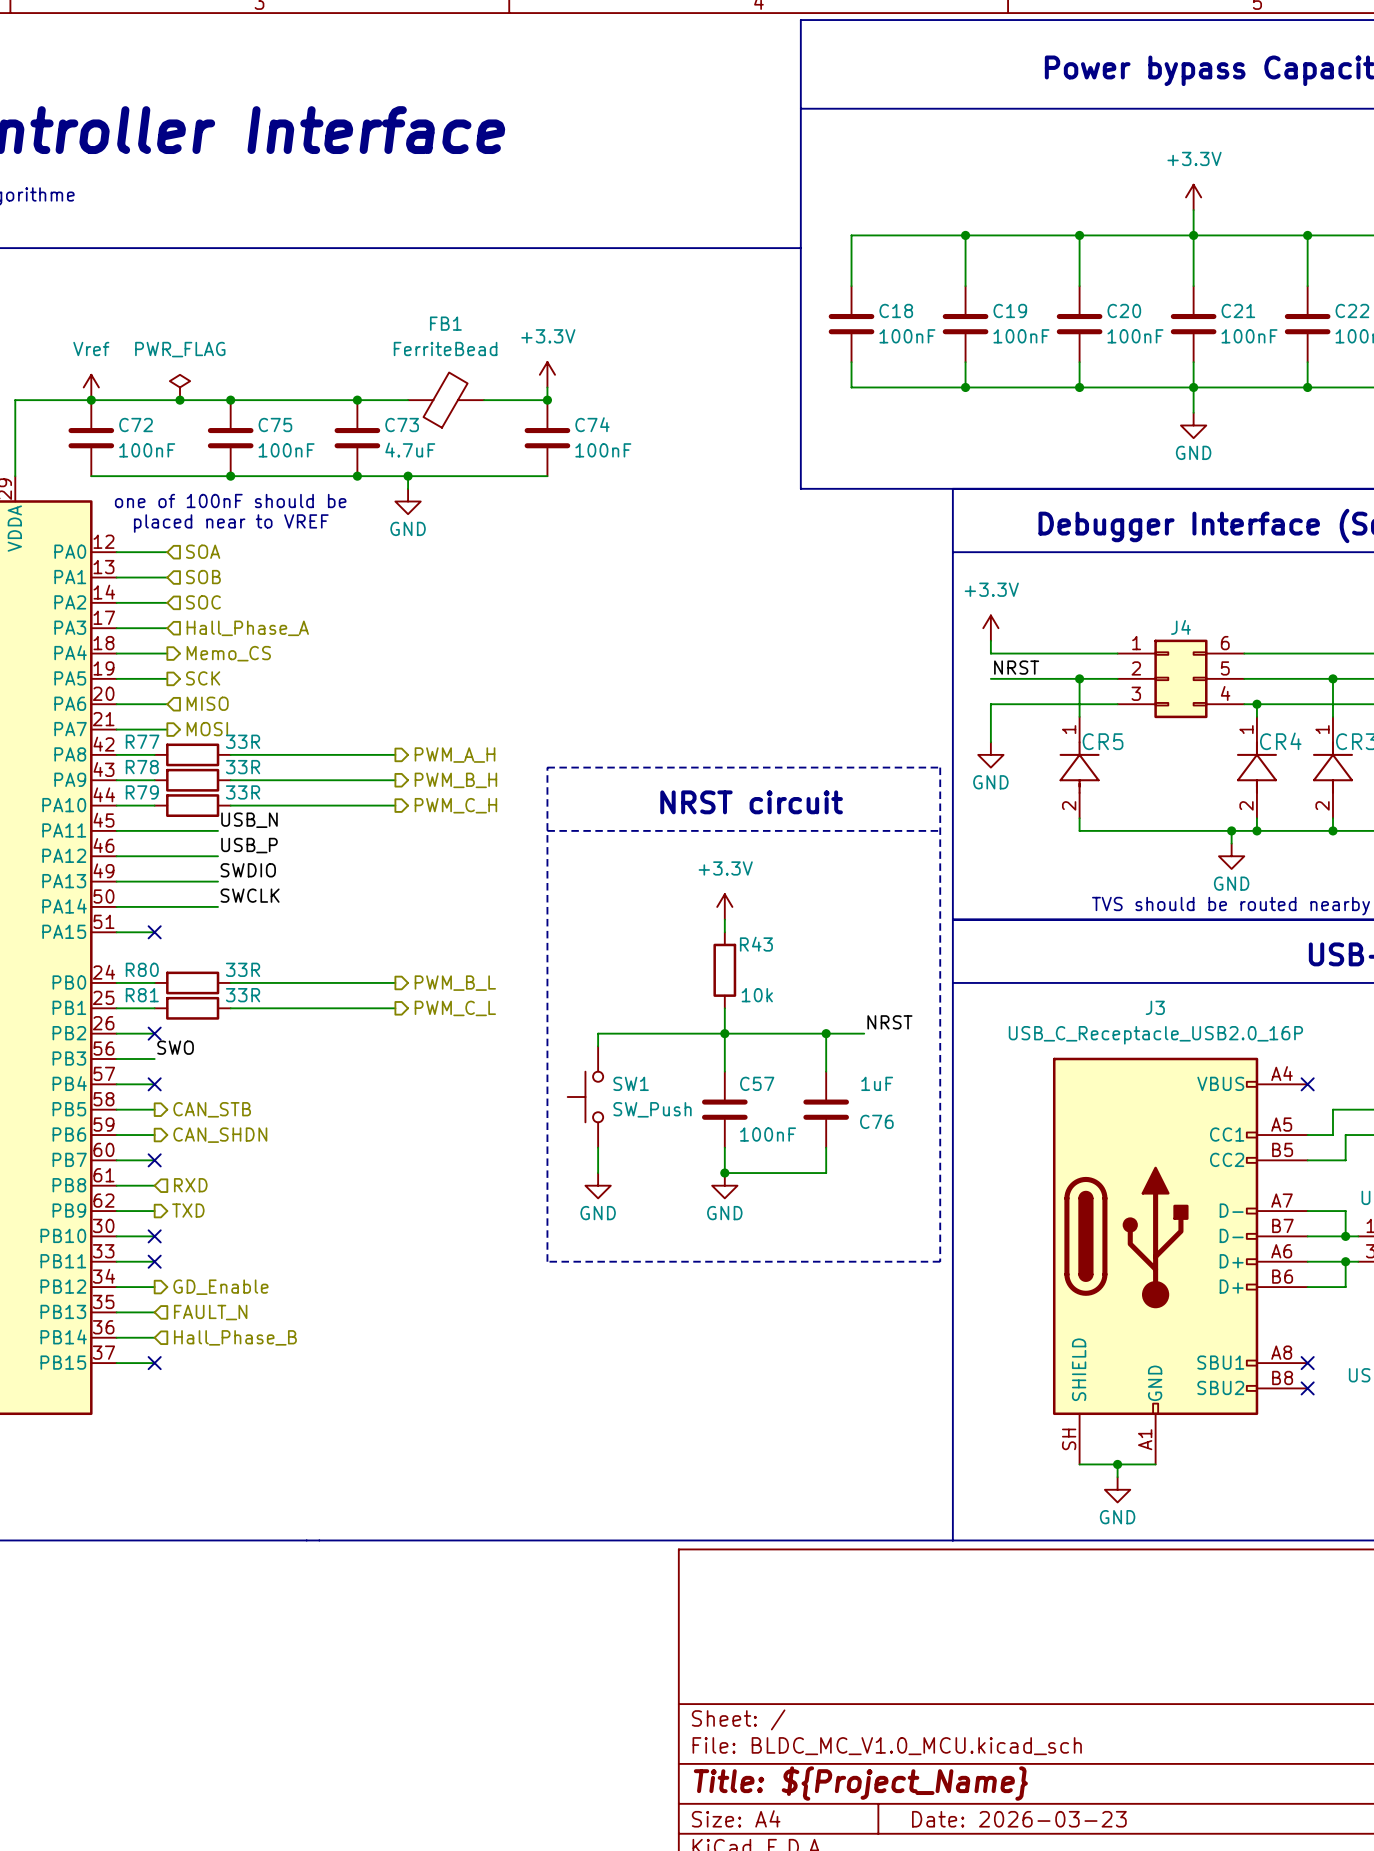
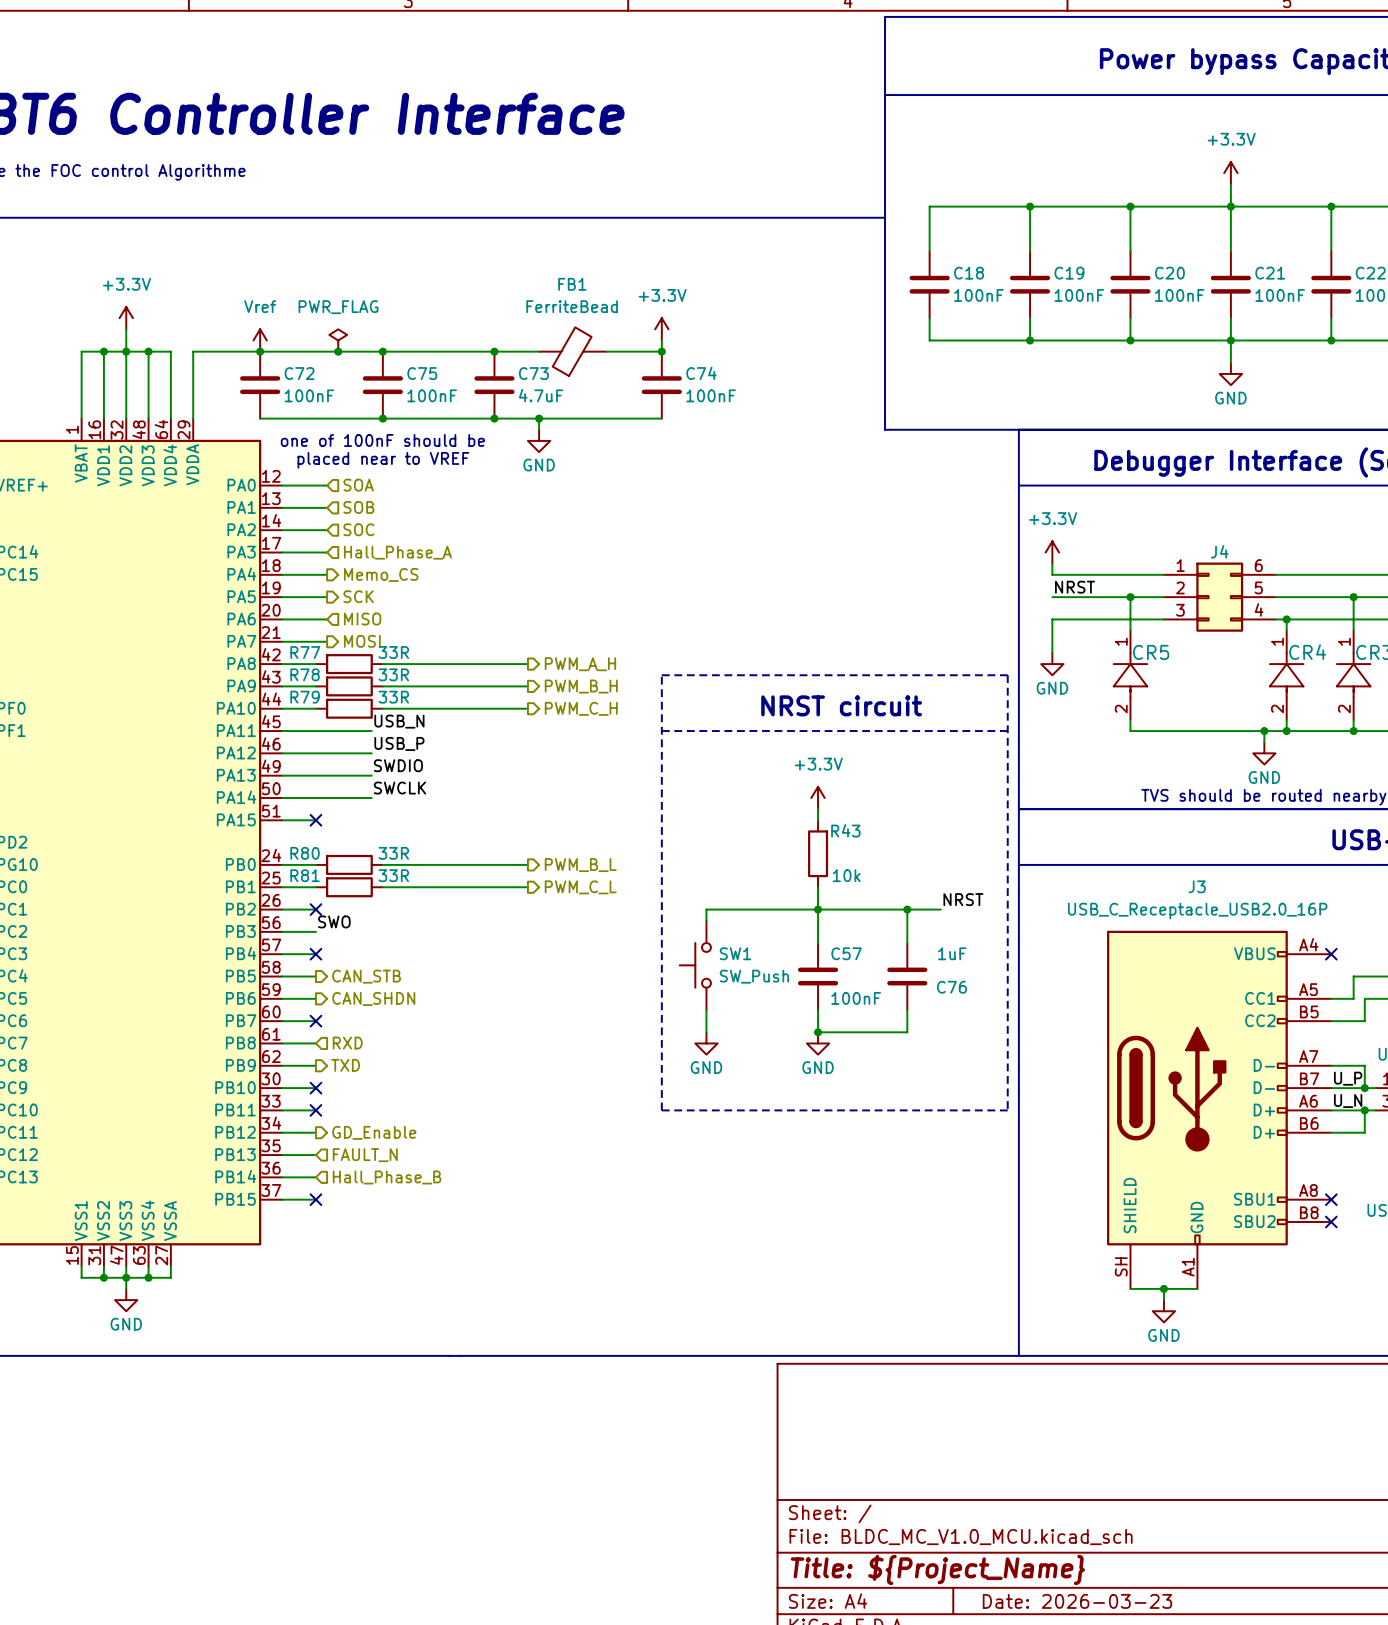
label: none -> U_P (1348, 1078)
label: none -> U_N (1348, 1100)

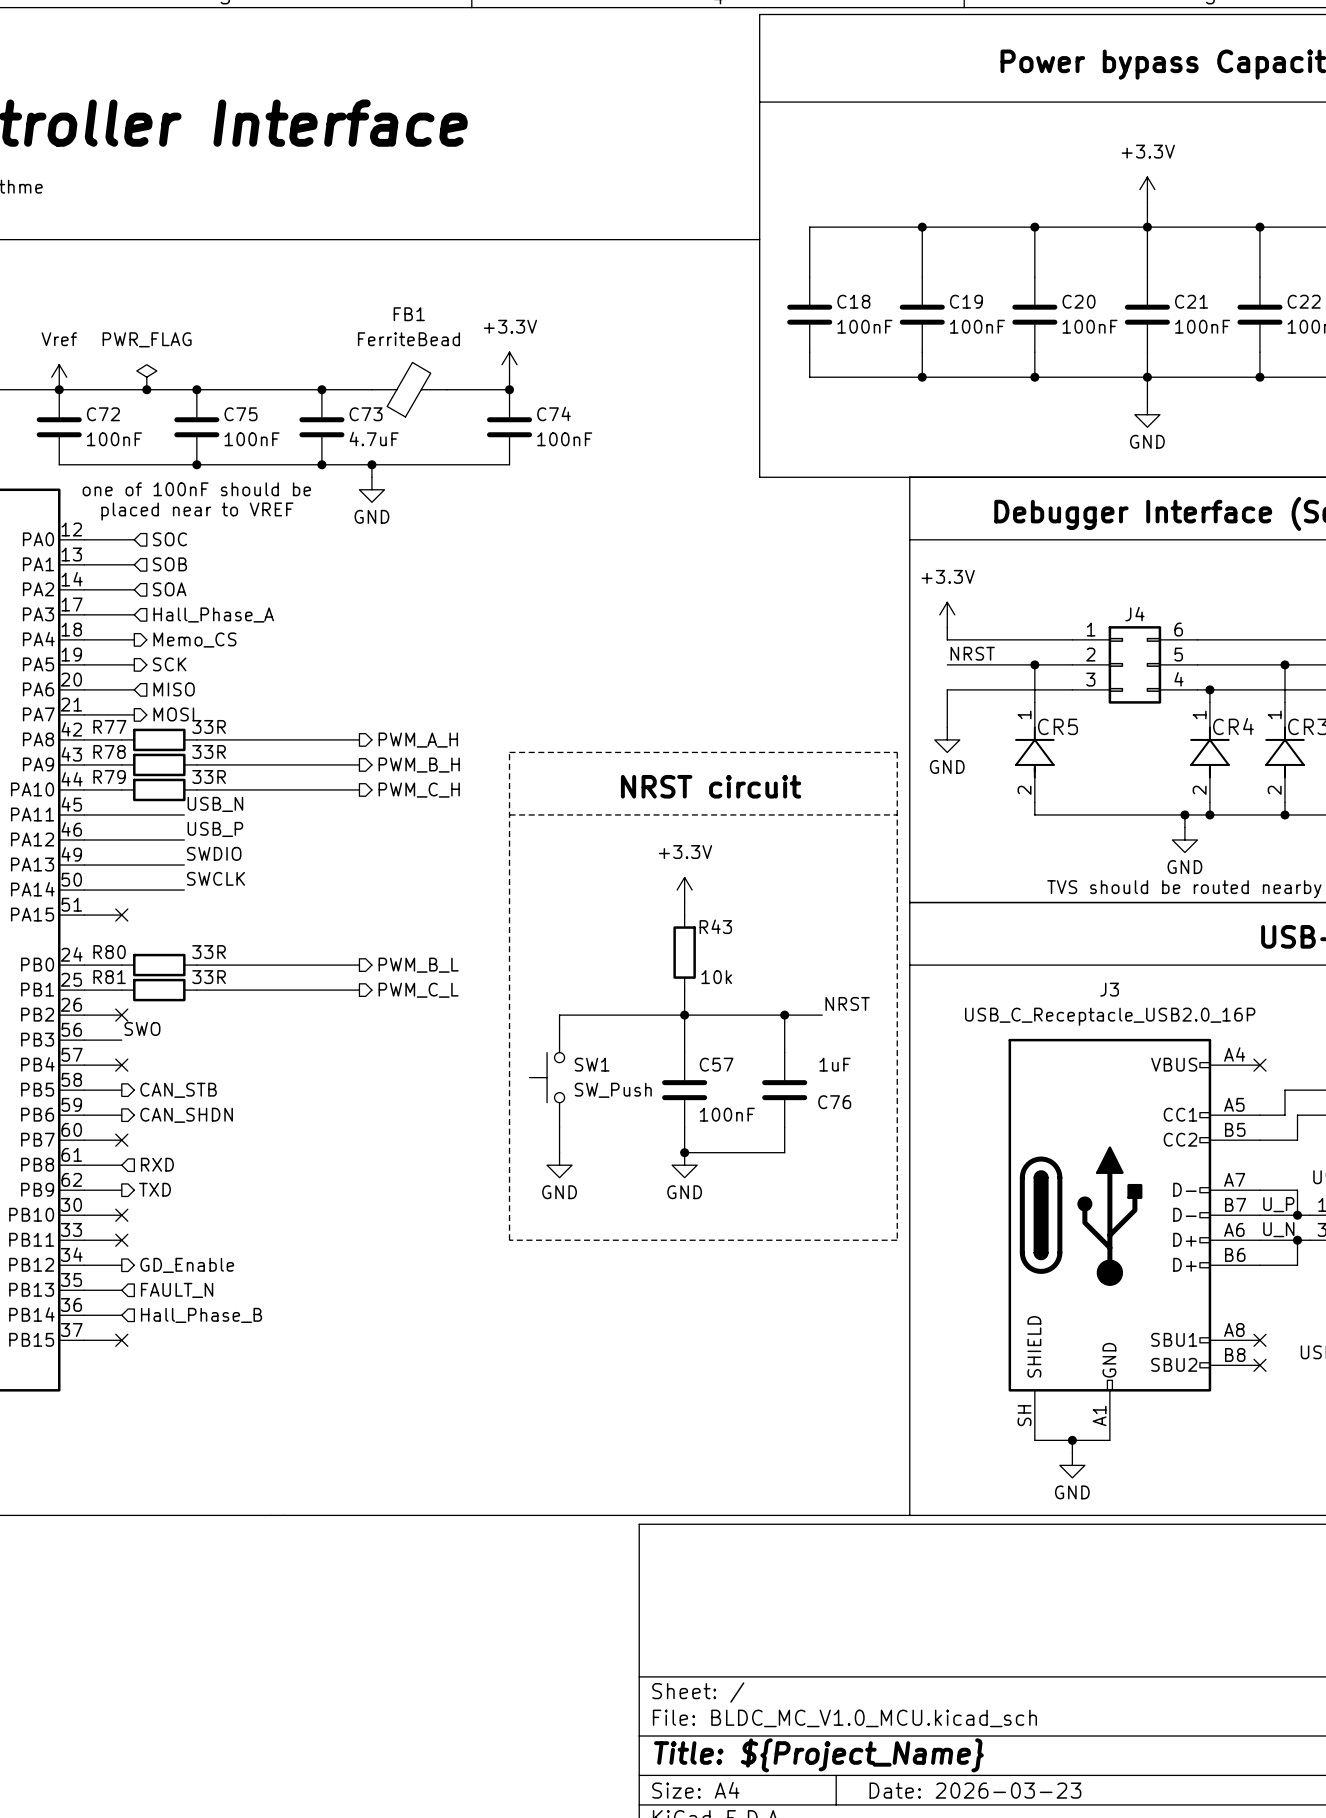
hierarchical label: SOA (358, 485) -> SOC (169, 539)
hierarchical label: SOC (358, 529) -> SOA (169, 589)

